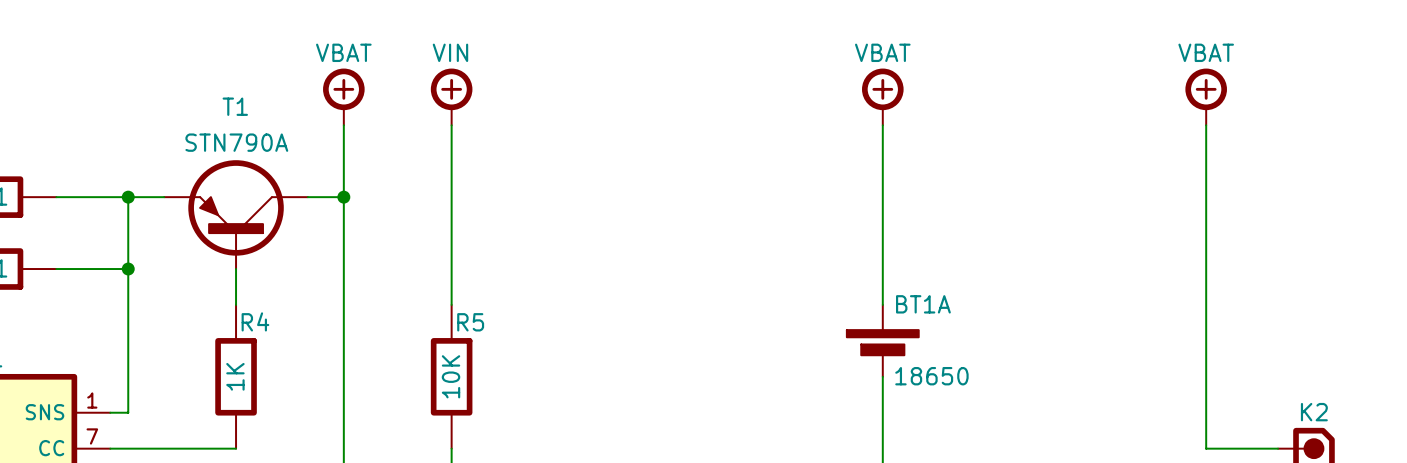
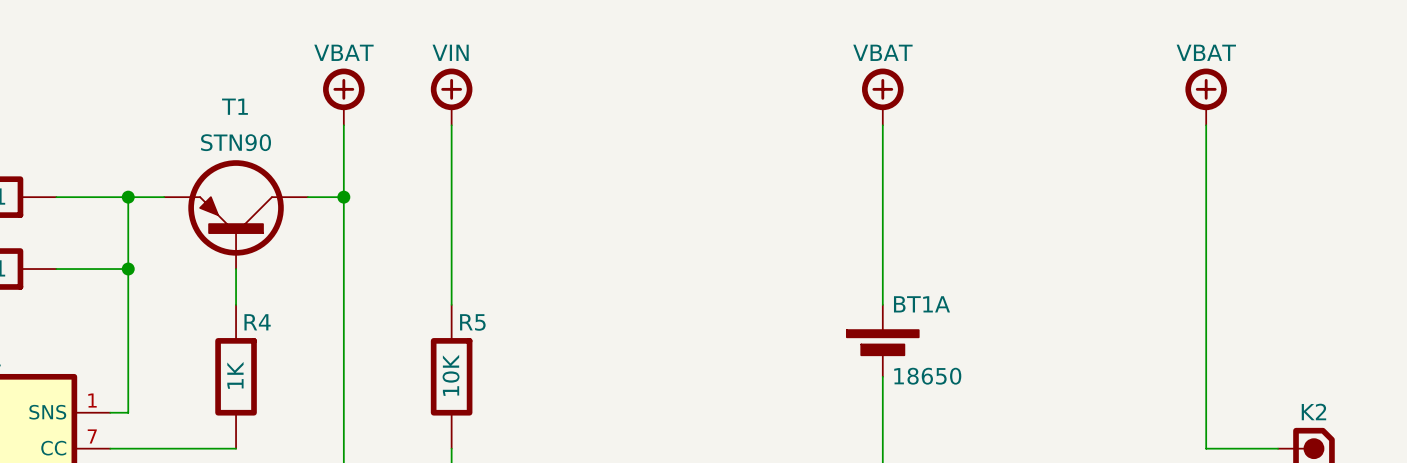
T1 text: none -> STN90 (236, 142)
T1 value: STN790A (236, 142) -> none

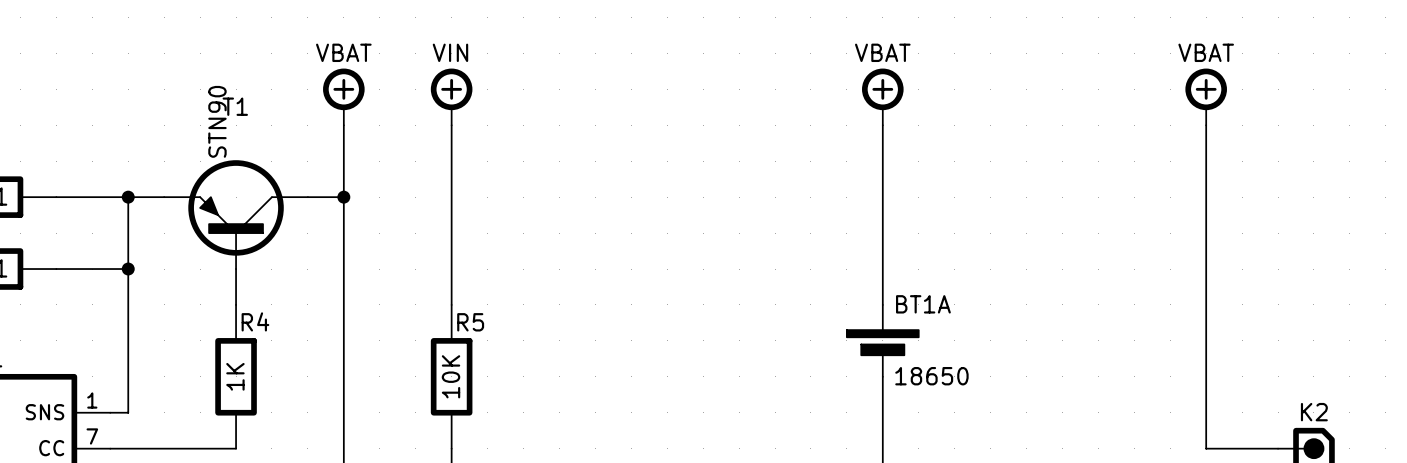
T1 text rotation: 0° (236, 142) -> 90° counterclockwise (217, 121)

